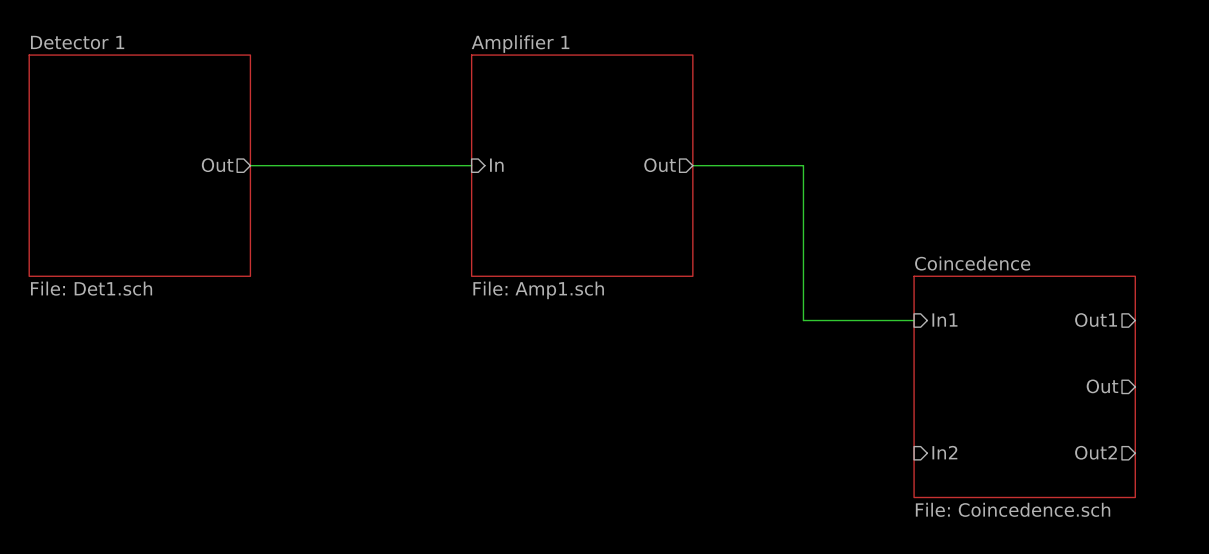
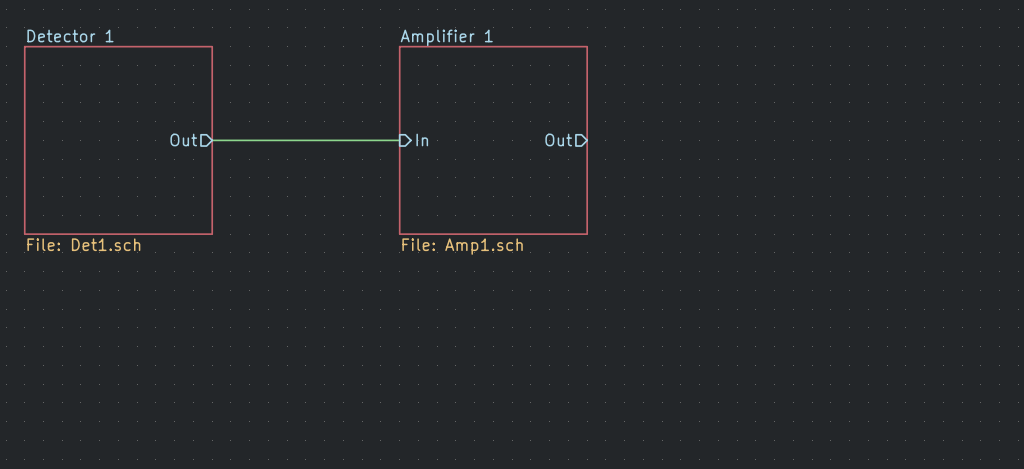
wire: (692, 165) (803, 165) (803, 320) (914, 320) -> none
sheet pin: In1 (944, 320) -> none
sheet pin: Out1 (1096, 320) -> none
sheet Coincedence: File: Coincedence.sch (1024, 386) -> none
sheet pin: Out (1102, 386) -> none
sheet pin: In2 (944, 452) -> none
sheet pin: Out2 (1095, 452) -> none

